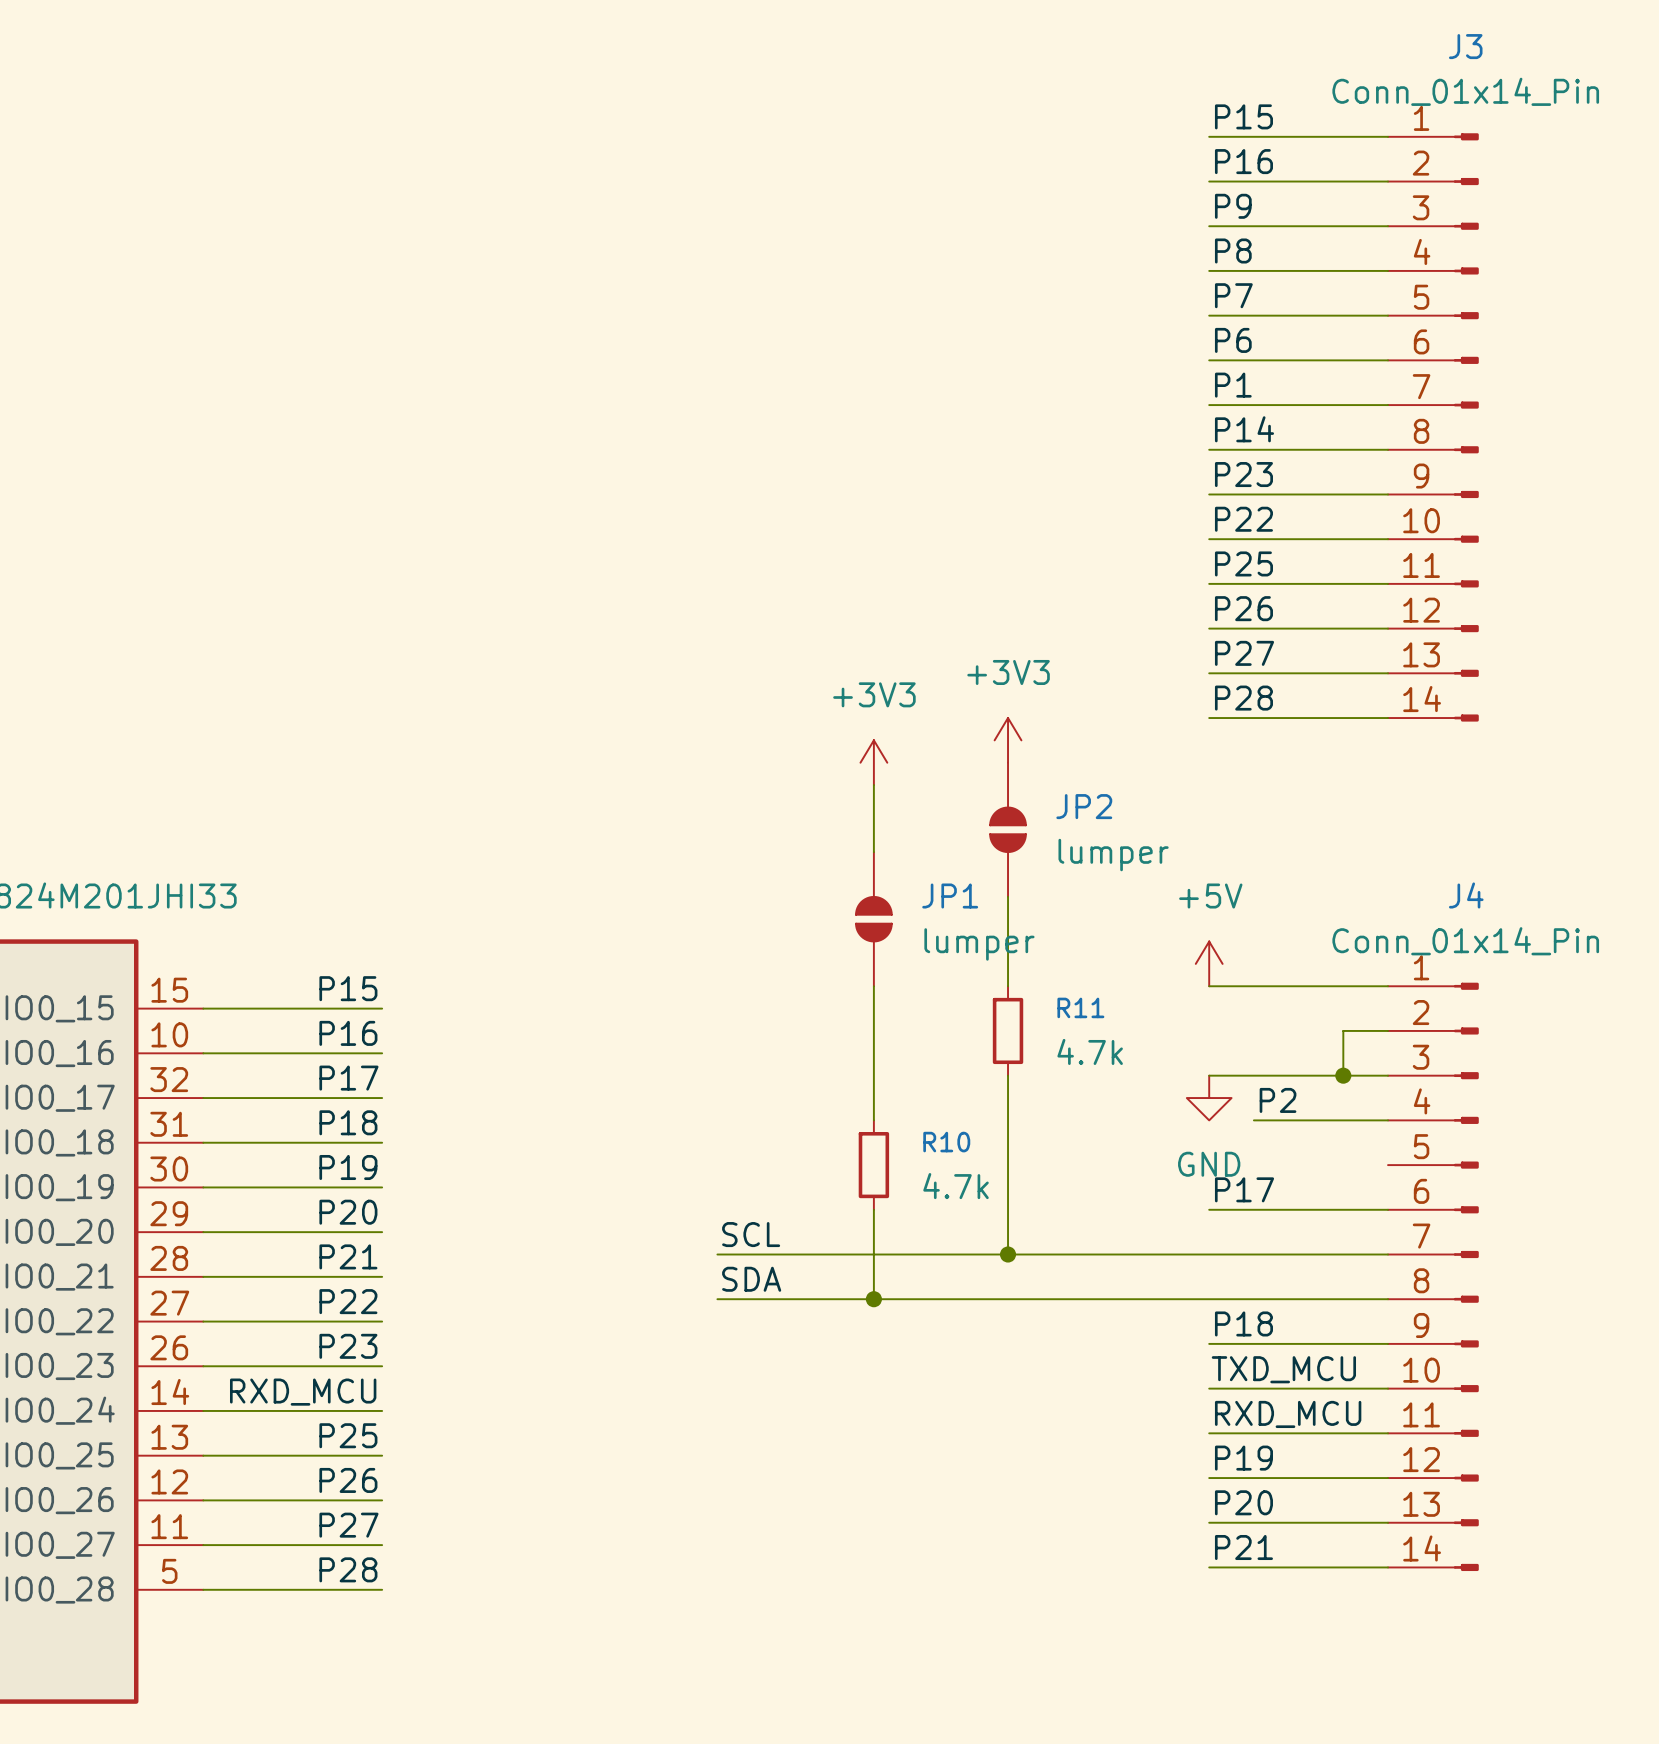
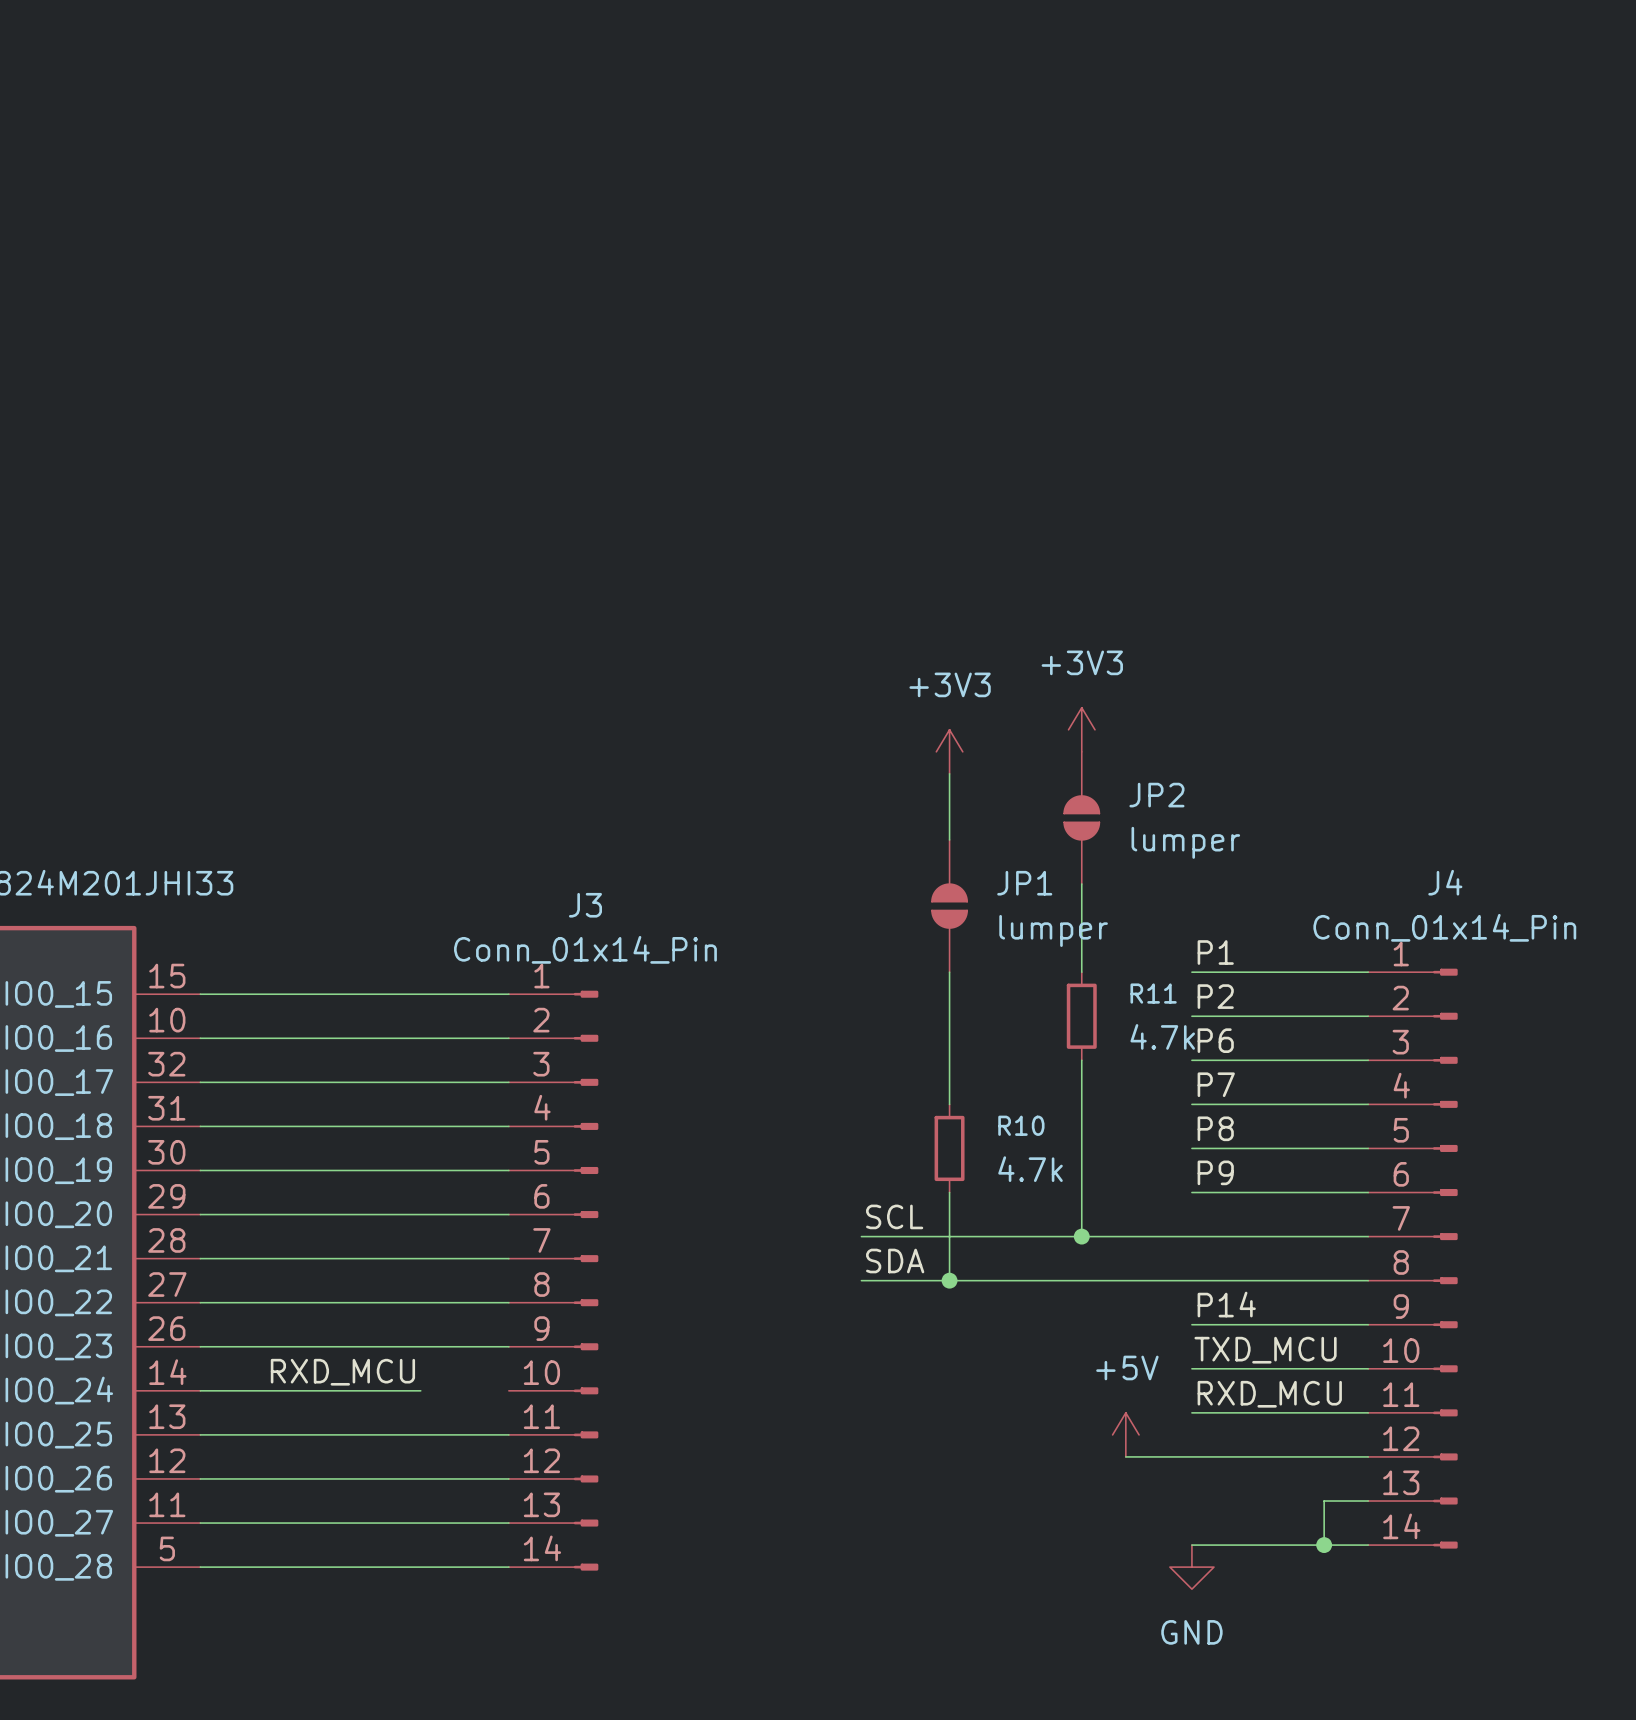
label: P15 (1243, 116) -> none
wire: (1209, 136) (1388, 136) -> none
label: P16 (1243, 161) -> none
wire: (1209, 181) (1388, 181) -> none
label: P9 (1233, 206) -> none
wire: (1209, 226) (1388, 226) -> none
label: P8 (1233, 251) -> none
wire: (1209, 270) (1388, 270) -> none
label: P7 (1233, 295) -> none
wire: (1209, 315) (1388, 315) -> none
label: P6 (1233, 340) -> none
wire: (1209, 360) (1388, 360) -> none
label: P1 (1233, 385) -> none
wire: (1209, 405) (1388, 405) -> none
J3 position: (1433, 427) -> (553, 1280)
label: P14 (1244, 429) -> none
wire: (1209, 449) (1388, 449) -> none
label: P23 (1243, 474) -> none
wire: (1209, 494) (1388, 494) -> none
label: P22 (1243, 519) -> none
wire: (1209, 539) (1388, 539) -> none
label: P25 (1243, 563) -> none
wire: (1209, 583) (1388, 583) -> none
label: P26 (1243, 608) -> none
wire: (1209, 628) (1388, 628) -> none
label: P27 (1244, 653) -> none
wire: (1209, 673) (1388, 673) -> none
label: P28 (1243, 698) -> none
wire: (1209, 718) (1388, 718) -> none
power symbol: +3V3 (1008, 740) -> none
power symbol: none -> +3V3 (1081, 729)
power symbol: +3V3 (873, 762) -> none
power symbol: none -> +3V3 (949, 751)
wire: (873, 785) (873, 852) -> (949, 773) (949, 839)
JP2 position: (1008, 829) -> (1081, 817)
wire: (1008, 896) (1008, 986) -> (1081, 884) (1081, 972)
JP1 position: (873, 919) -> (949, 906)
power symbol: +5V (1209, 963) -> none
label: none -> P1 (1215, 952)
wire: (873, 986) (873, 1120) -> (949, 972) (949, 1104)
label: P15 (348, 988) -> none
wire: none -> (376, 994) (508, 994)
R11 position: (1008, 1030) -> (1081, 1016)
wire: (1343, 1030) (1343, 1075) -> (1324, 1016) (1191, 1016)
label: P16 (348, 1033) -> none
wire: none -> (376, 1038) (508, 1038)
label: none -> P6 (1215, 1040)
wire: (1008, 1075) (1008, 1254) -> (1081, 1060) (1081, 1236)
junction: (1343, 1075) -> none
label: P17 (348, 1078) -> none
wire: none -> (376, 1082) (508, 1082)
power symbol: GND (1209, 1098) -> none
label: none -> P7 (1216, 1084)
label position: P2 (1278, 1100) -> P2 (1215, 996)
wire: none -> (1191, 1104) (1236, 1104)
label: P18 (348, 1122) -> none
wire: none -> (376, 1126) (508, 1126)
label: none -> P8 (1215, 1128)
R10 position: (873, 1165) -> (949, 1148)
wire: none -> (1191, 1148) (1368, 1148)
label: P19 (348, 1167) -> none
wire: none -> (376, 1170) (508, 1170)
label: P17 (1244, 1189) -> P9 (1215, 1172)
wire: (873, 1209) (873, 1299) (717, 1299) -> none
wire: none -> (949, 1192) (949, 1280)
label: P20 (348, 1212) -> none
wire: none -> (376, 1214) (508, 1214)
label position: SCL (751, 1234) -> SCL (894, 1216)
wire: (717, 1254) (873, 1254) -> none
junction: (1008, 1254) -> none
junction: none -> (1081, 1236)
label: P21 (348, 1256) -> none
wire: none -> (376, 1258) (508, 1258)
label position: SDA (751, 1279) -> SDA (895, 1261)
junction: (873, 1299) -> none
junction: none -> (949, 1280)
label: P22 (348, 1301) -> none
wire: none -> (376, 1302) (508, 1302)
label: P18 (1243, 1323) -> P14 (1226, 1304)
label: P23 (348, 1346) -> none
wire: none -> (376, 1346) (508, 1346)
label position: RXD_MCU (303, 1392) -> RXD_MCU (342, 1372)
wire: none -> (376, 1390) (420, 1390)
label: P25 (348, 1435) -> none
wire: none -> (376, 1434) (508, 1434)
power symbol: none -> +5V (1125, 1434)
label: P19 (1243, 1458) -> none
wire: none -> (1125, 1456) (1191, 1456)
label: P26 (348, 1480) -> none
wire: none -> (376, 1478) (508, 1478)
label: P20 (1243, 1502) -> none
wire: (1209, 1522) (1343, 1522) -> (1324, 1545) (1324, 1501)
label: P27 (348, 1525) -> none
wire: none -> (376, 1523) (508, 1523)
label: P21 (1243, 1547) -> none
junction: none -> (1324, 1545)
label: P28 (348, 1569) -> none
wire: none -> (376, 1567) (508, 1567)
power symbol: none -> GND (1191, 1567)

